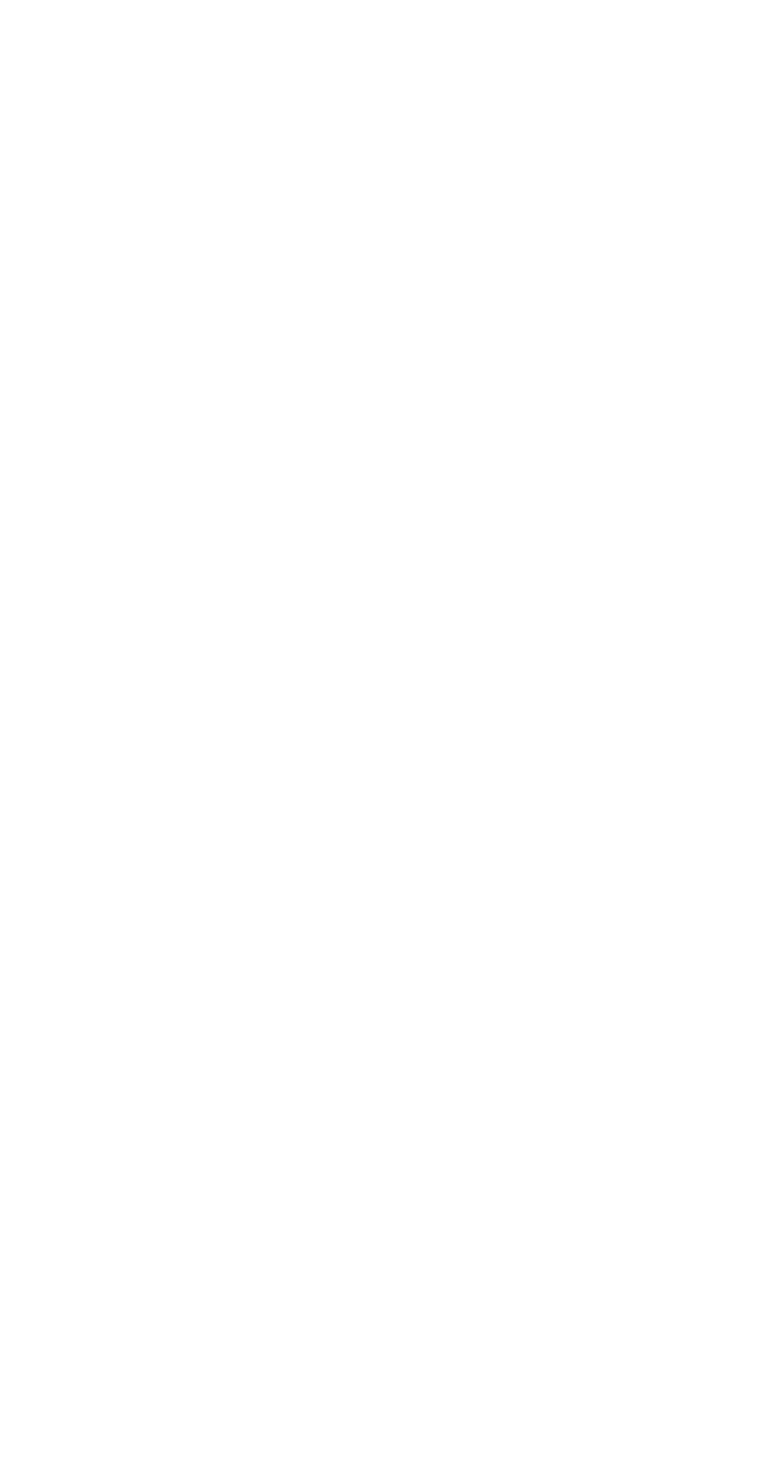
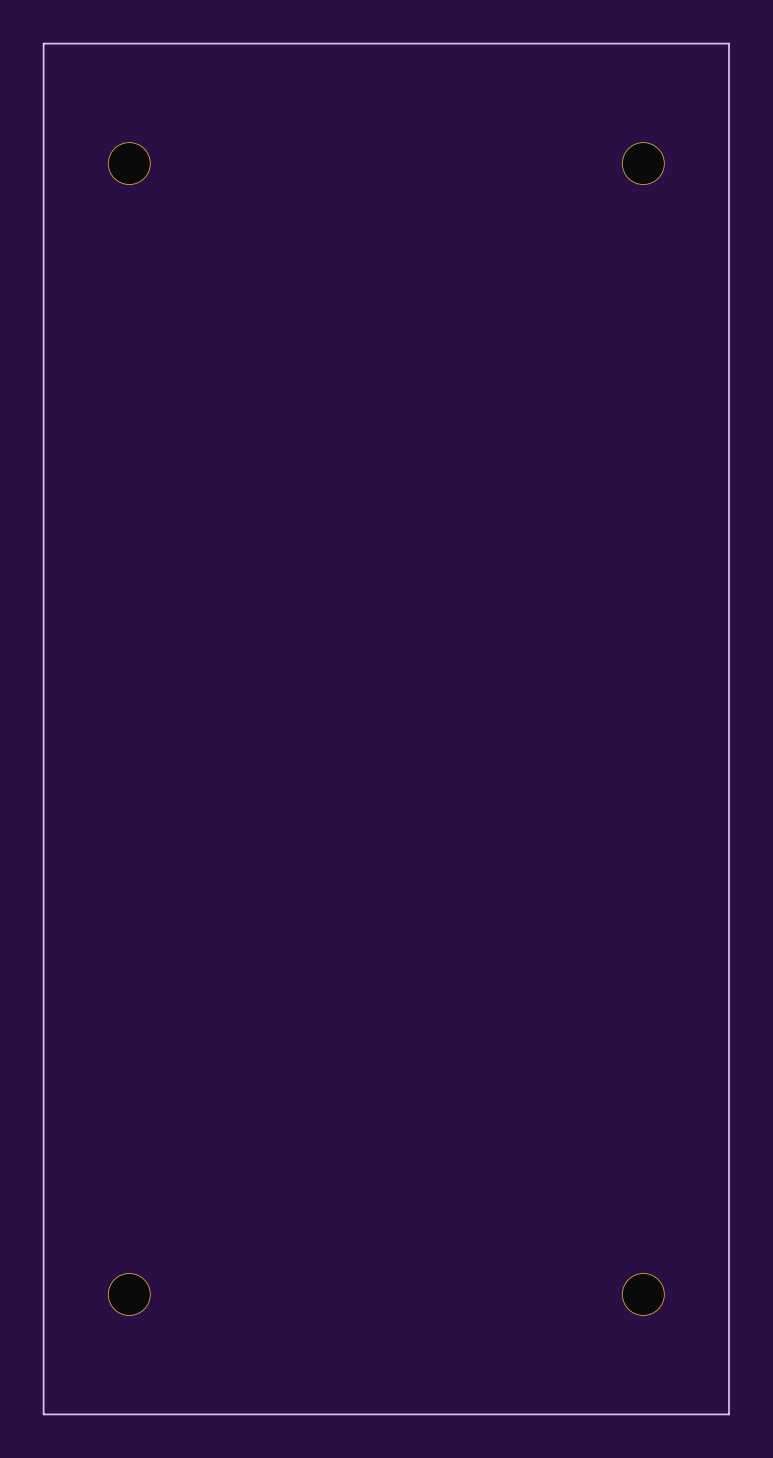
board edge: none -> (729, 43) (43, 43) (43, 1414) (729, 1414) (729, 43)
via: none -> (129, 163)
via: none -> (643, 163)
via: none -> (129, 1294)
via: none -> (643, 1294)

